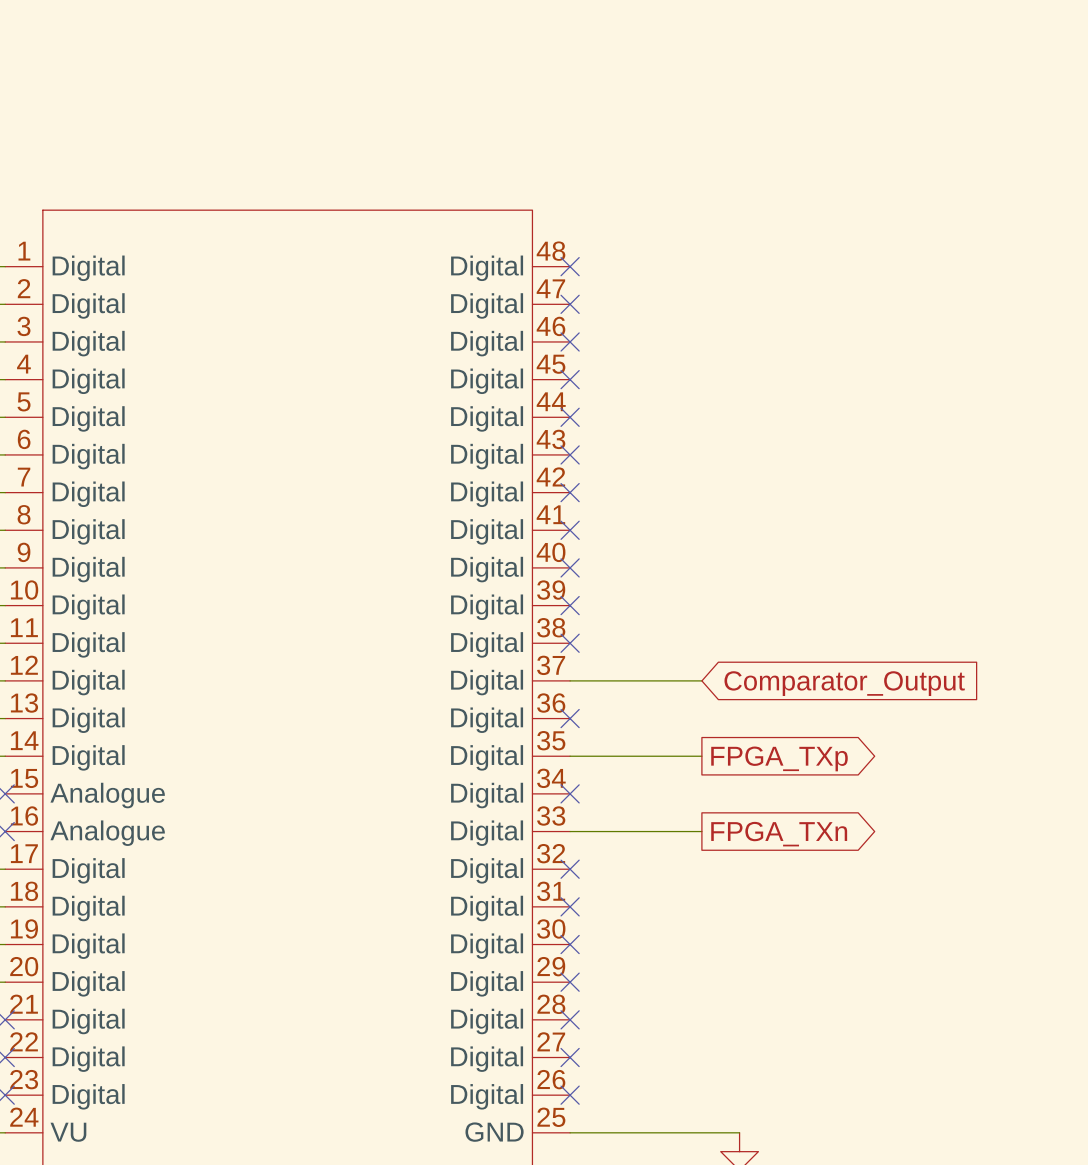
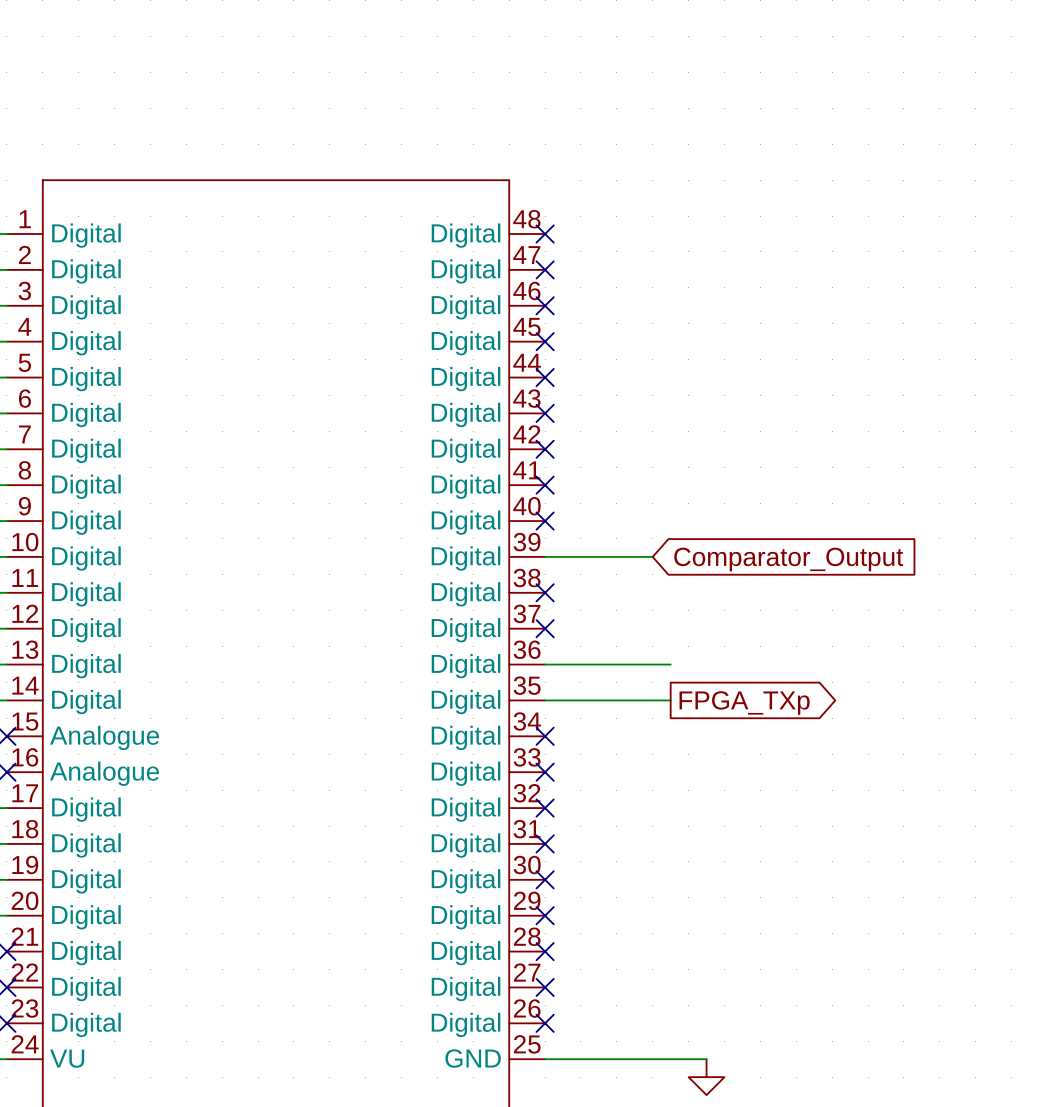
wire: none -> (545, 556) (652, 556)
no-connect mark: (570, 605) -> none
wire: (570, 680) (701, 680) -> (545, 664) (670, 664)
no-connect mark: none -> (545, 628)
global label position: Comparator_Output (844, 683) -> Comparator_Output (788, 559)
no-connect mark: (570, 718) -> none
wire: (570, 831) (701, 831) -> none
no-connect mark: none -> (545, 772)
global label: FPGA_TXn (779, 834) -> none

